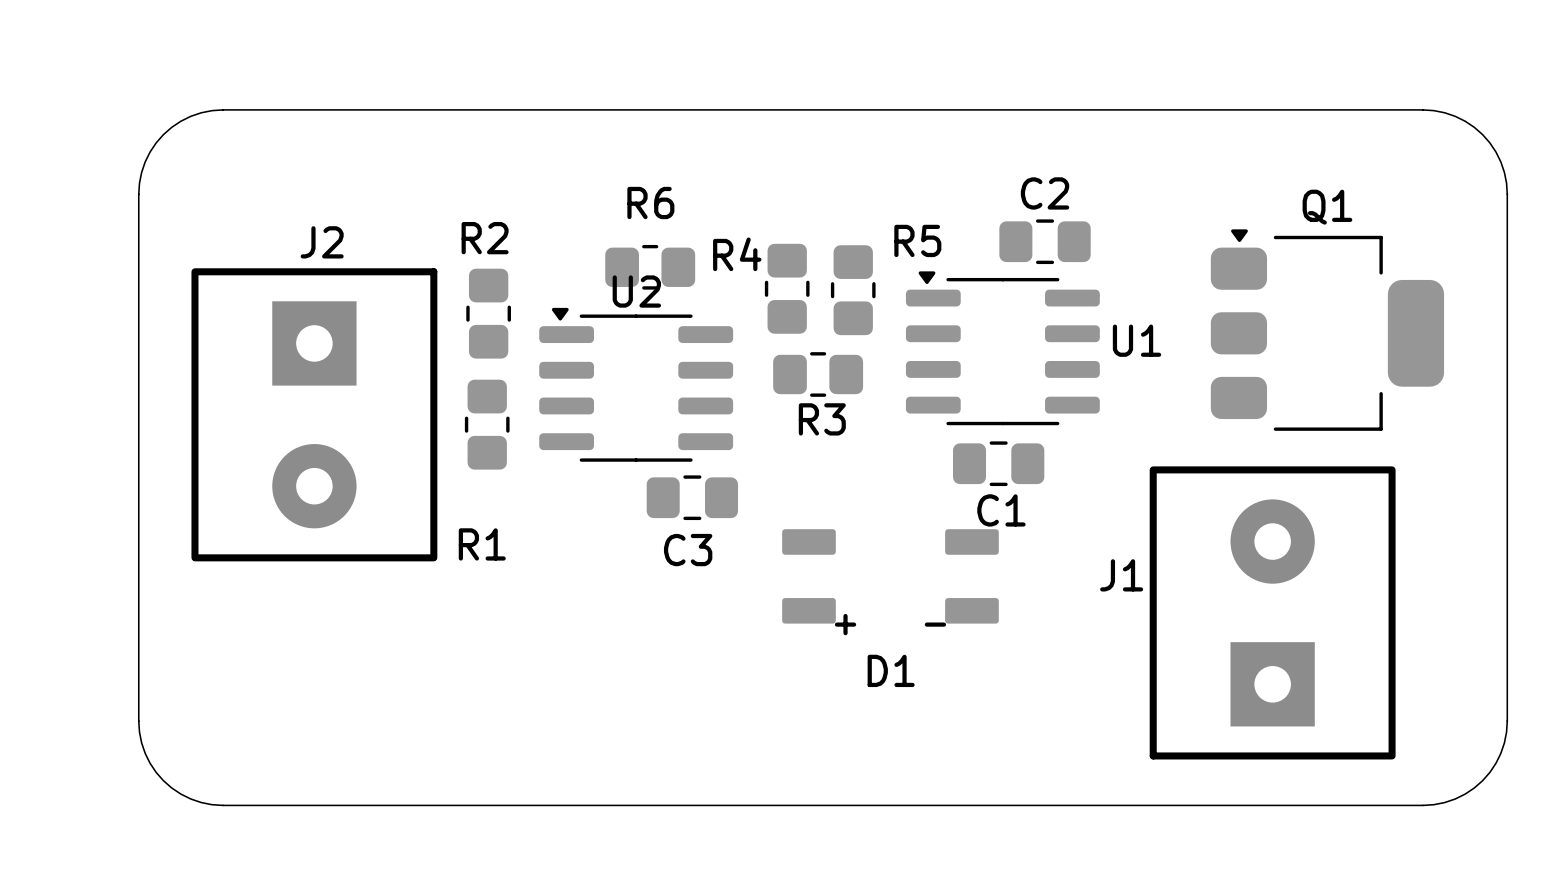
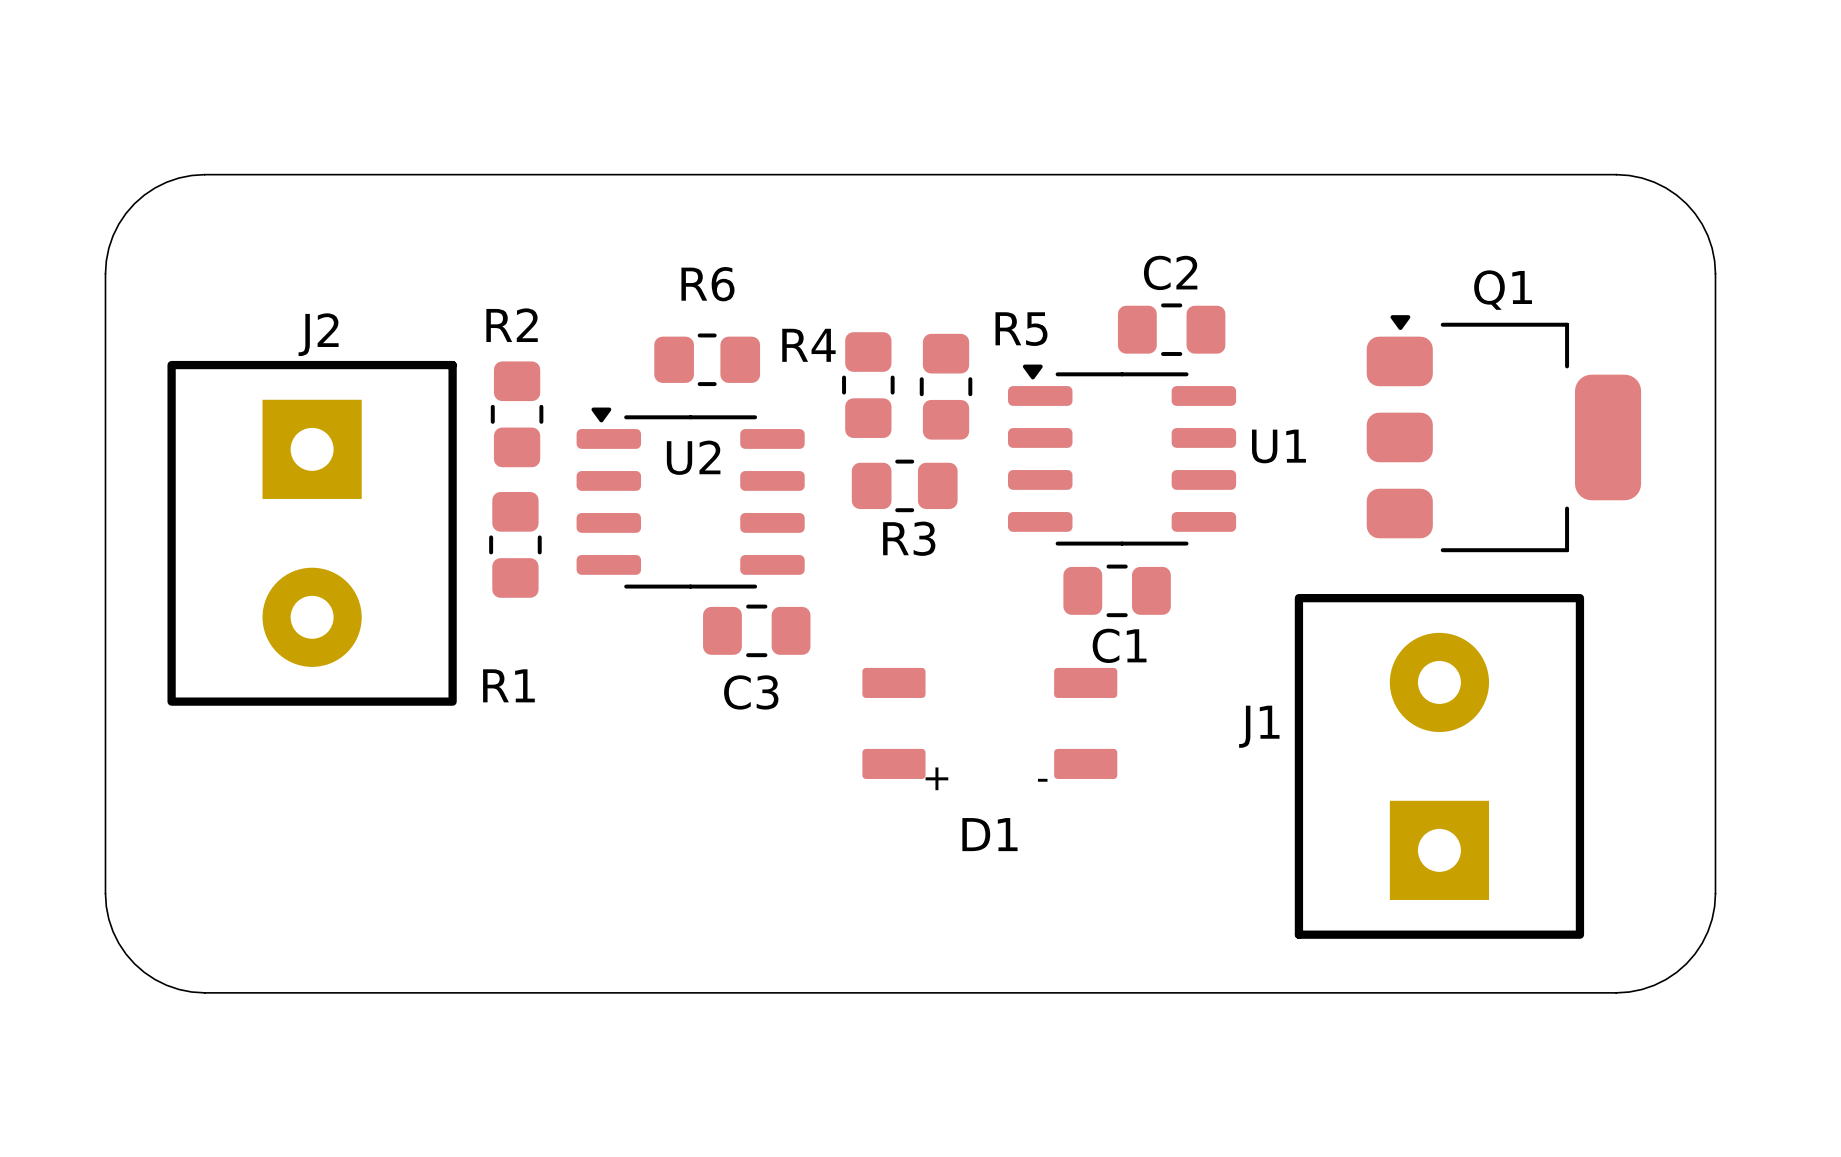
U2 name position: U2 (636, 291) -> U2 (693, 457)

